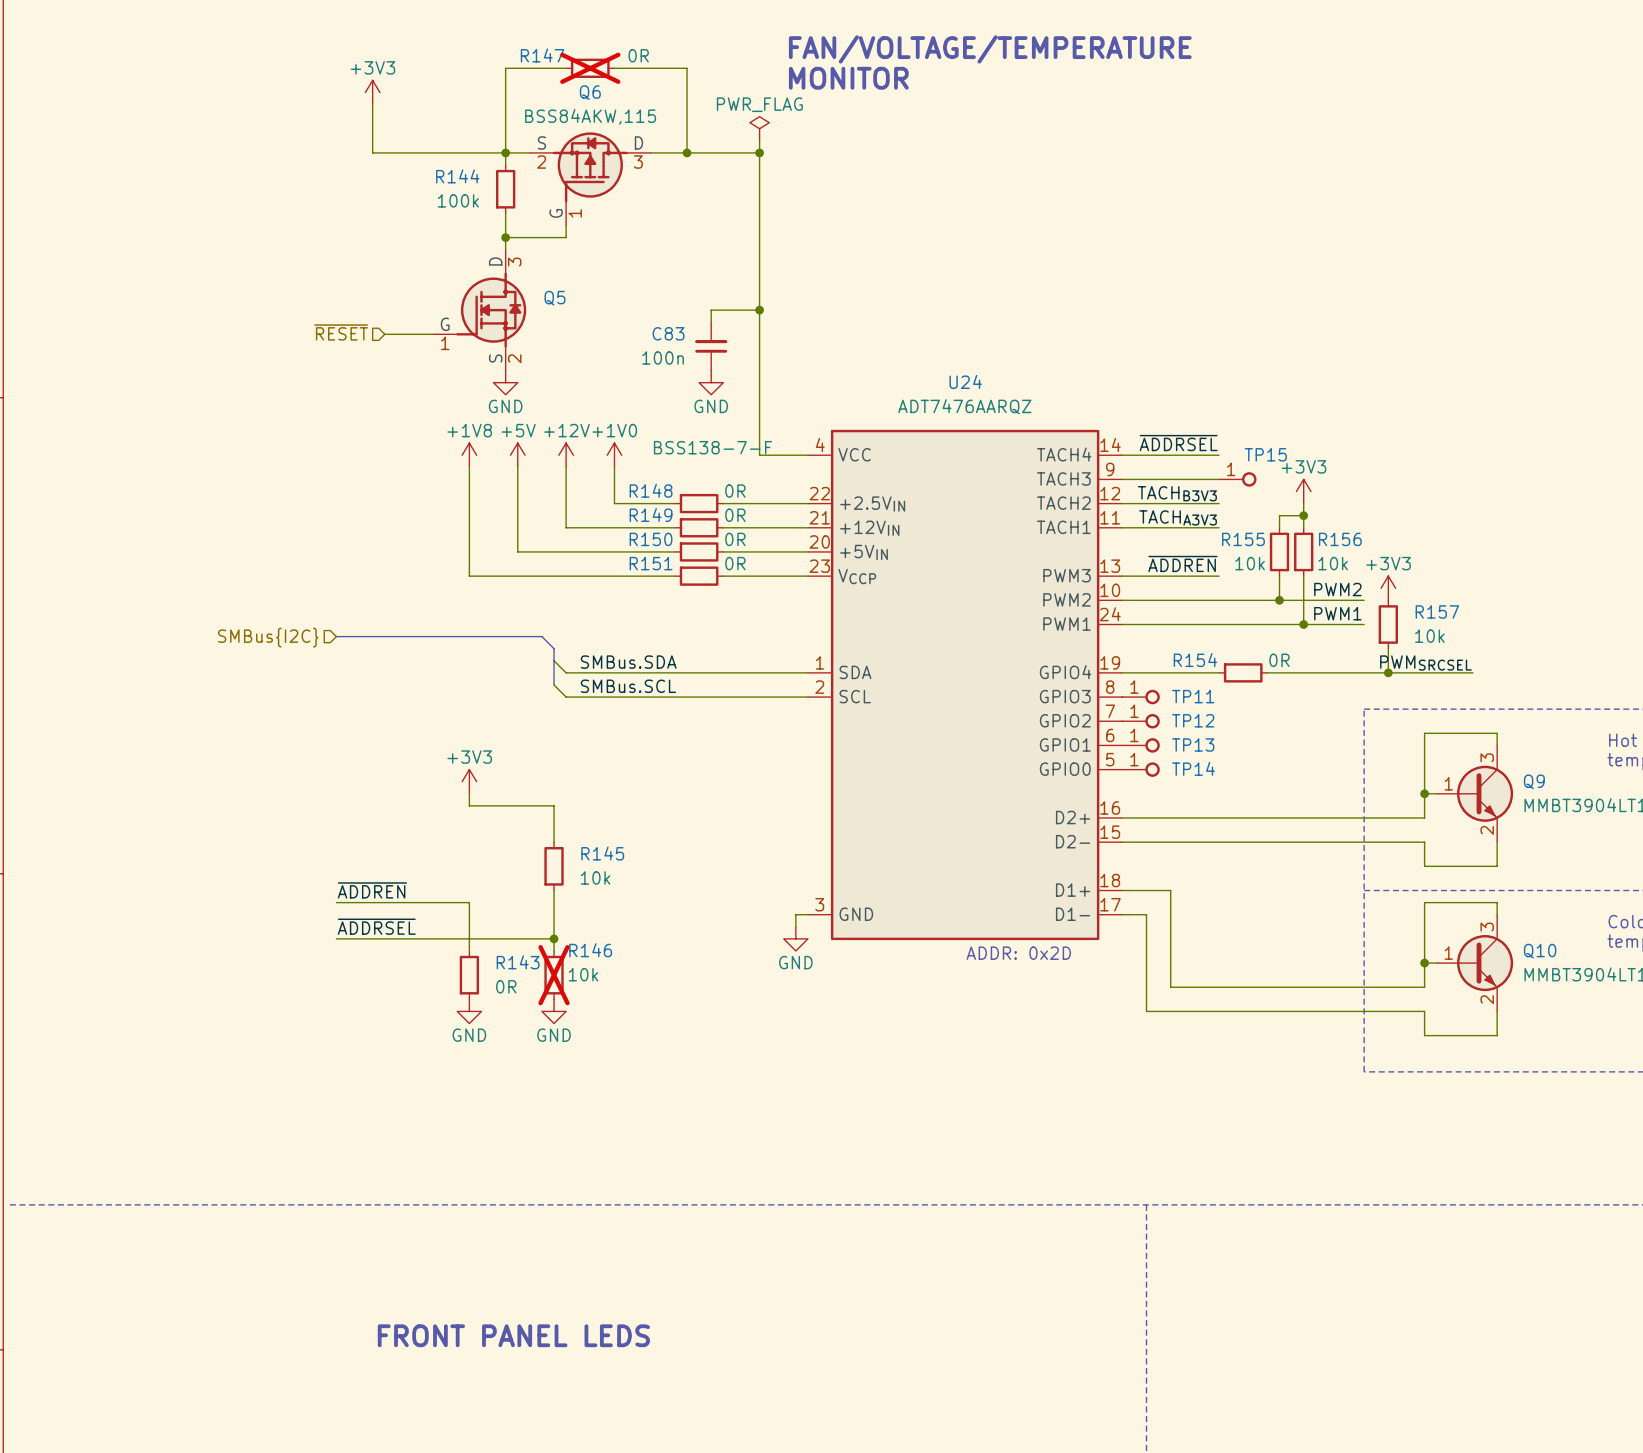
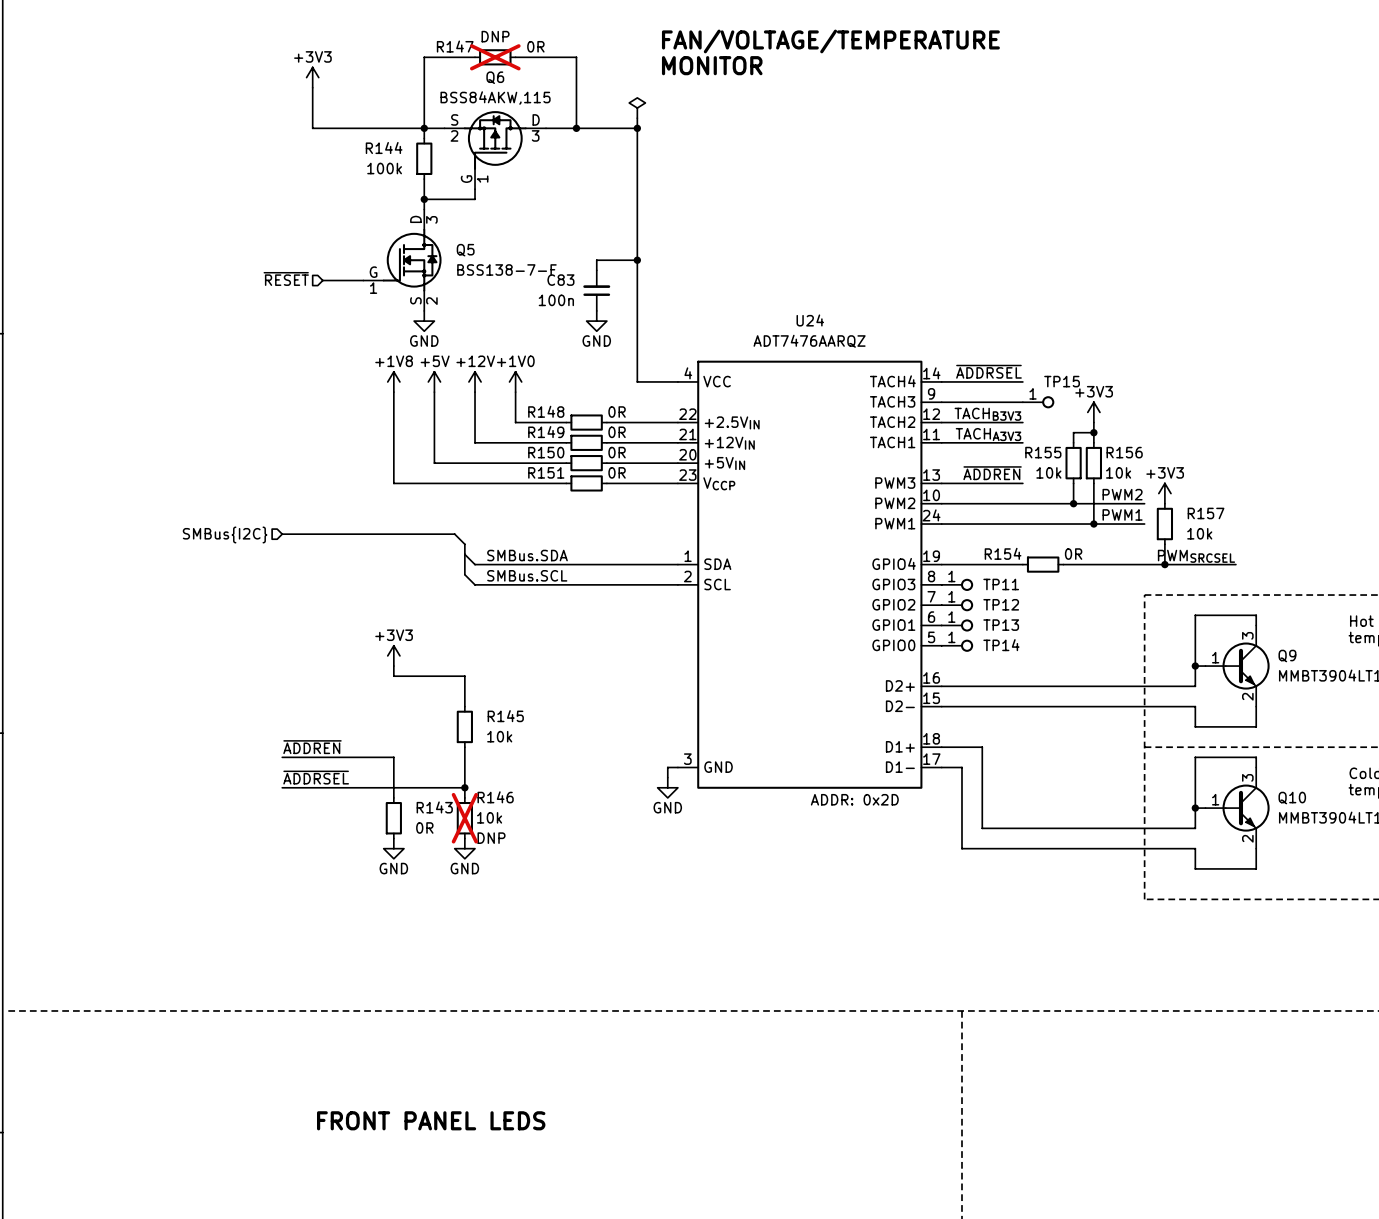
R147 text: none -> DNP (495, 36)
power symbol text: PWR_FLAG (759, 104) -> none
Q5 value: none -> BSS138-7-F (506, 269)
Q5 text: BSS138-7-F (713, 447) -> none
R146 text: none -> DNP (491, 838)

